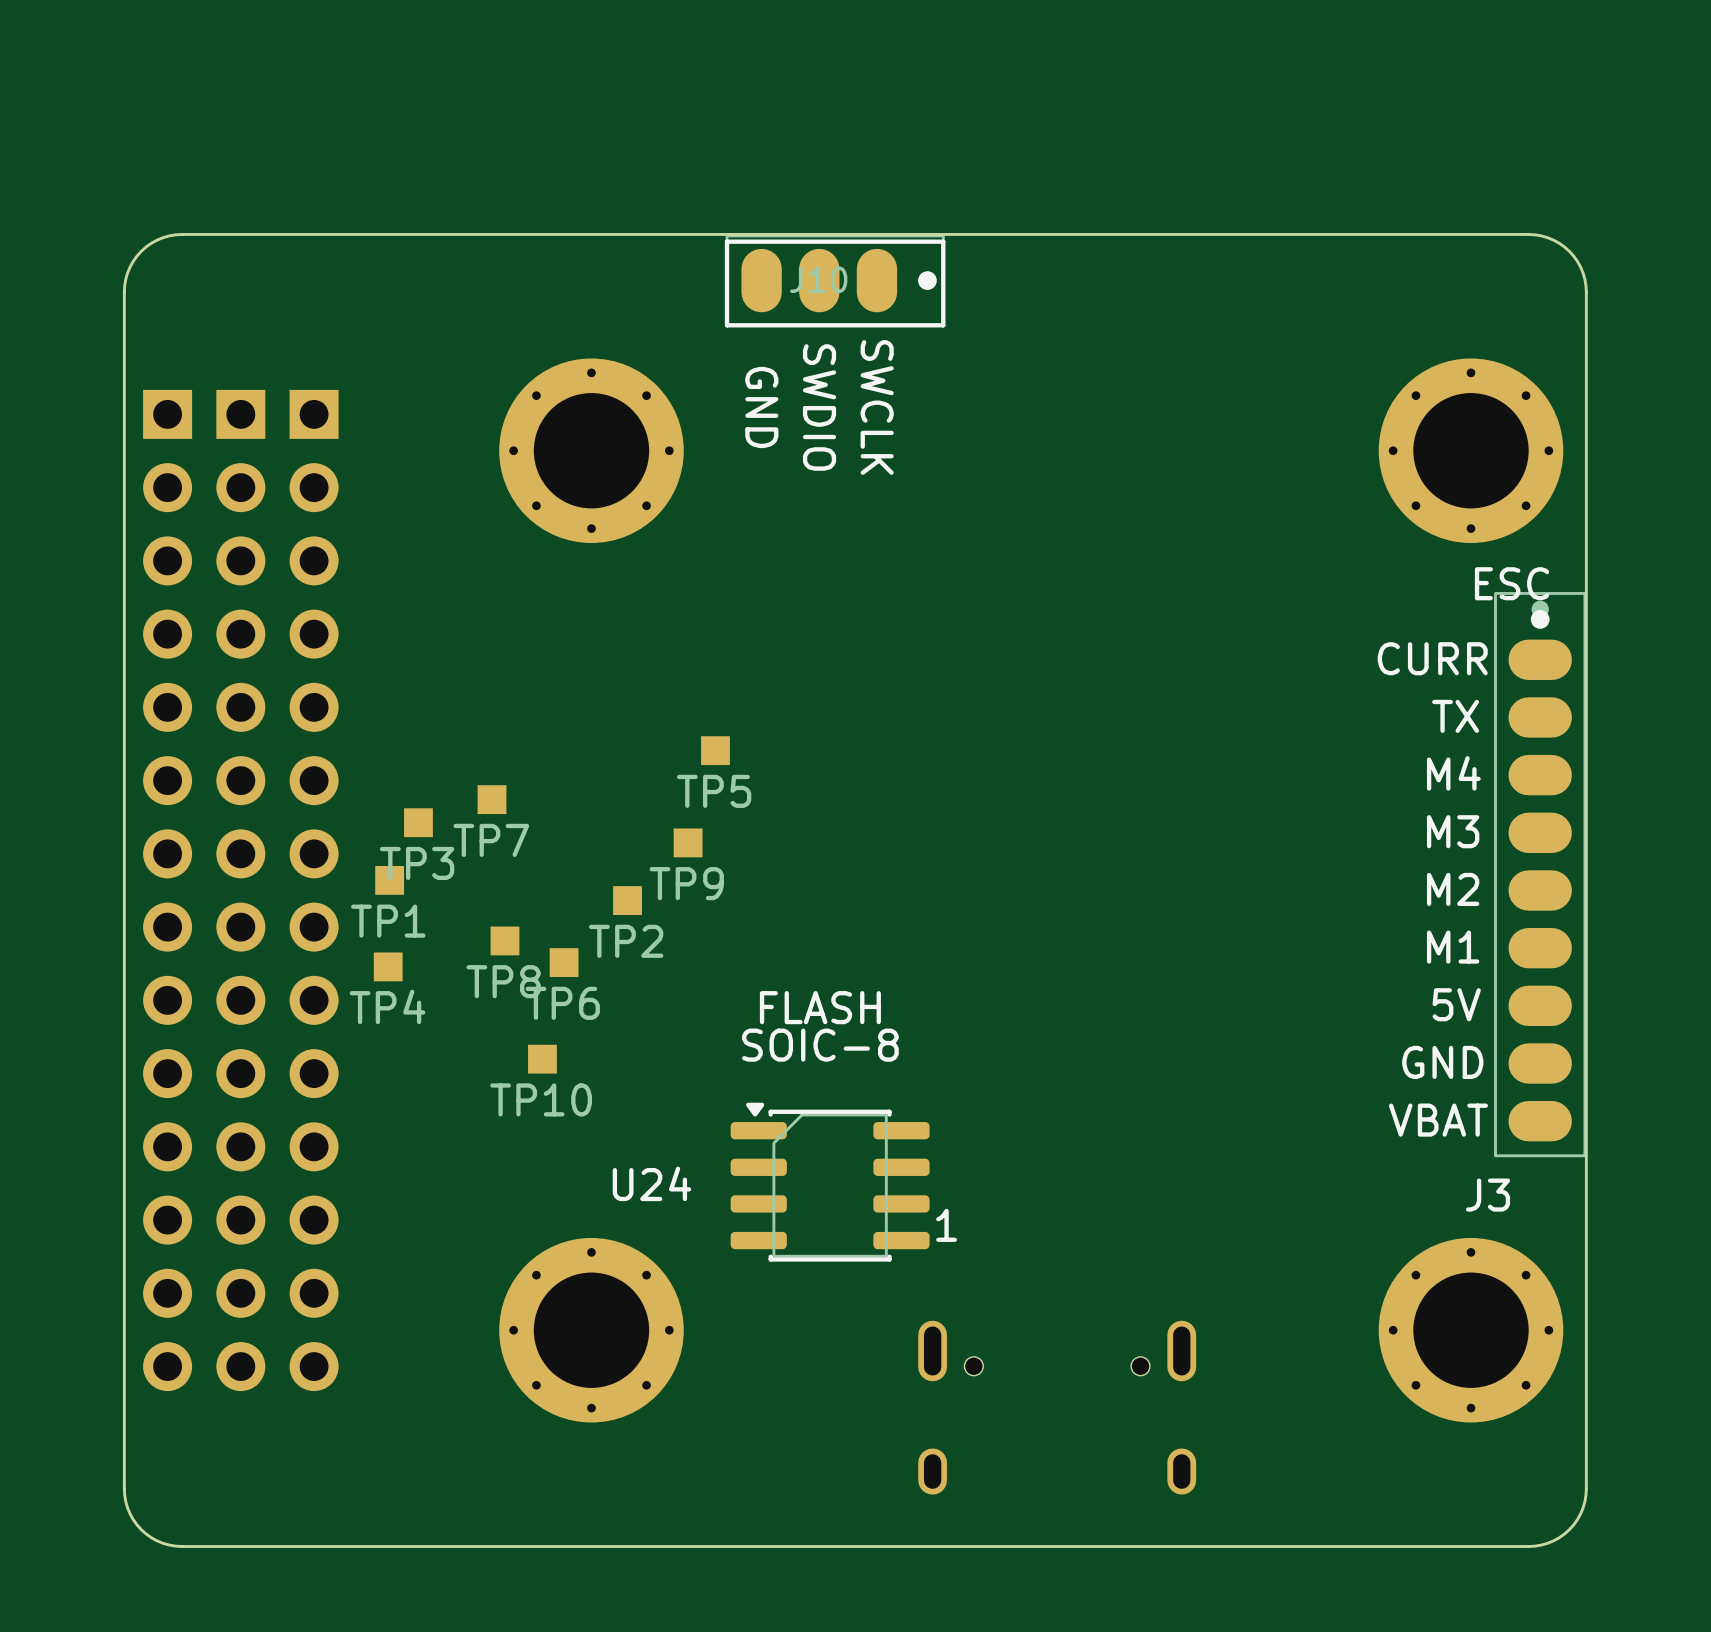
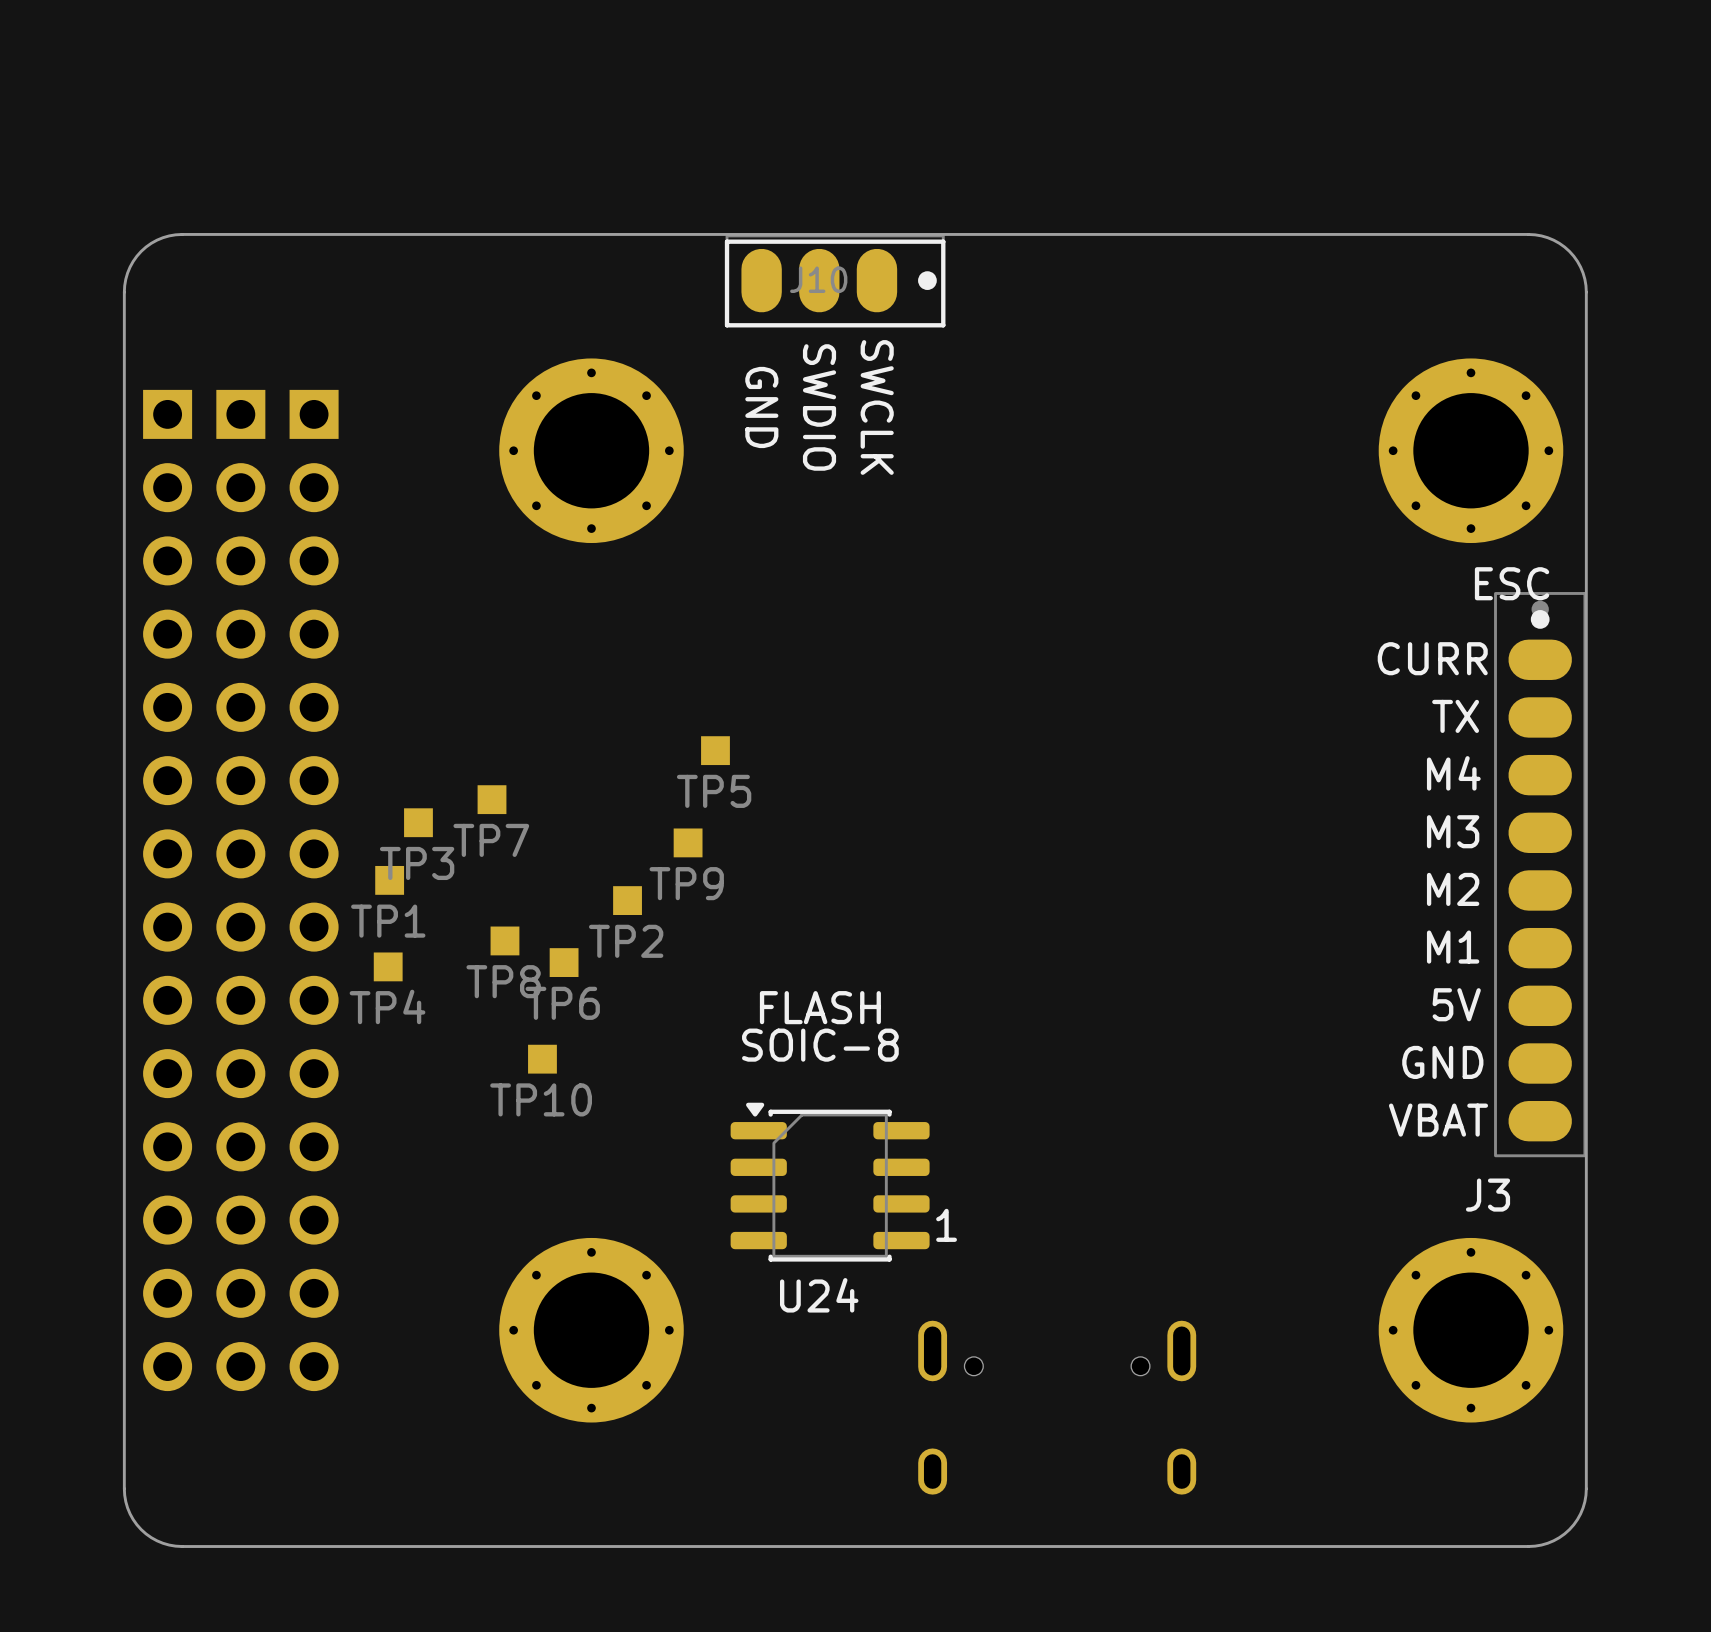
U24 name position: U24 (651, 1183) -> U24 (819, 1295)

